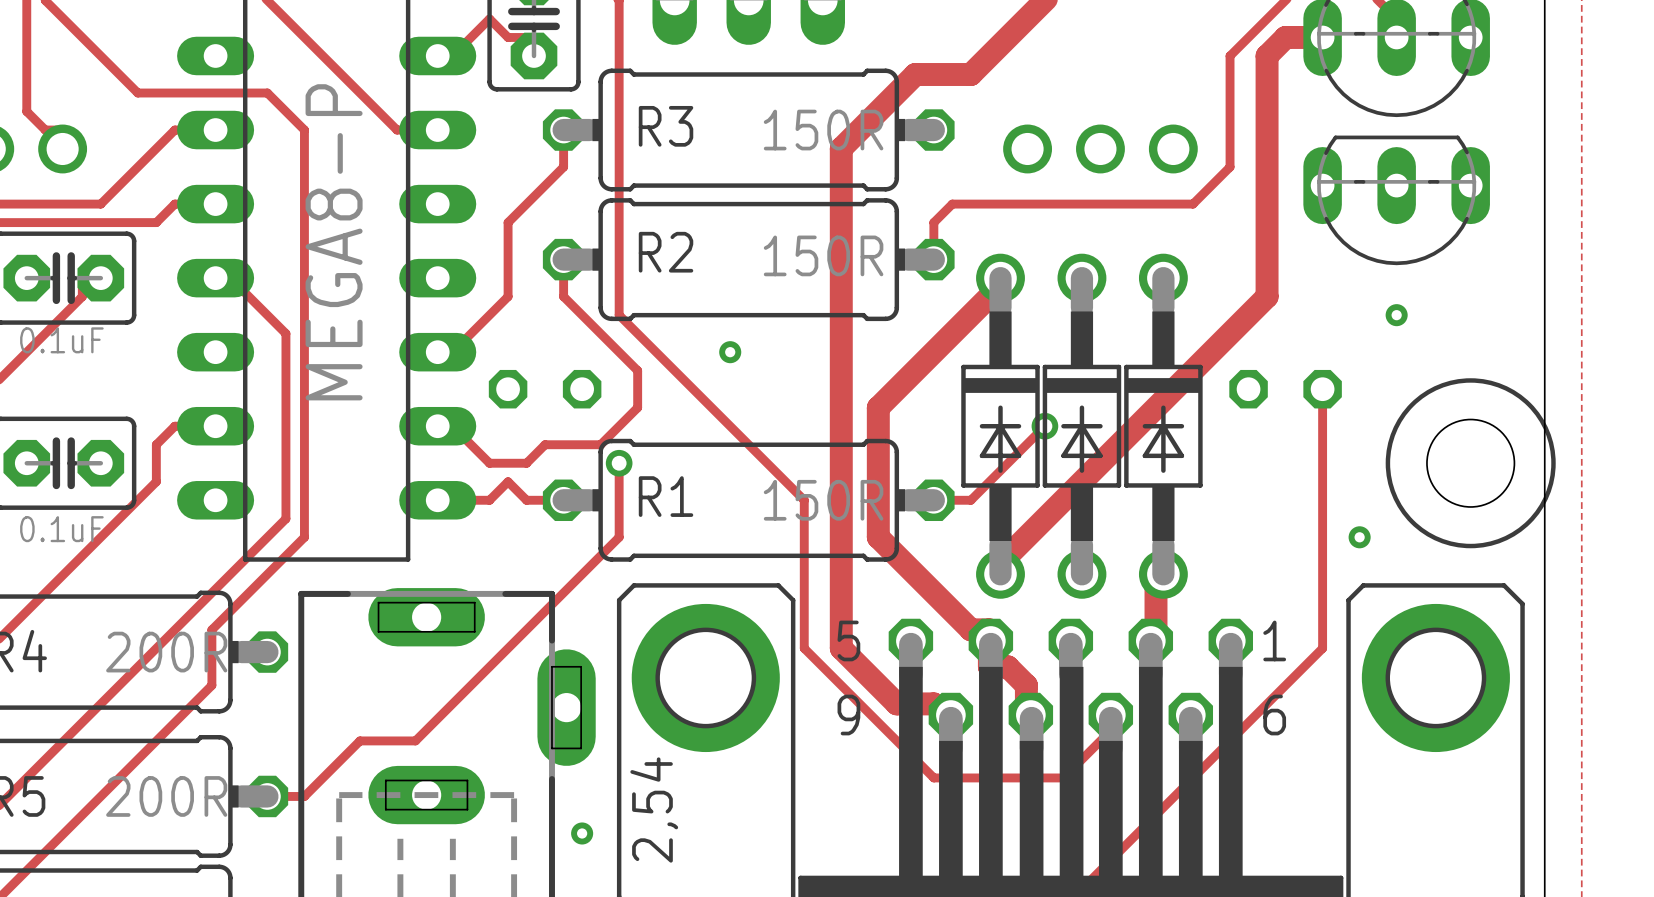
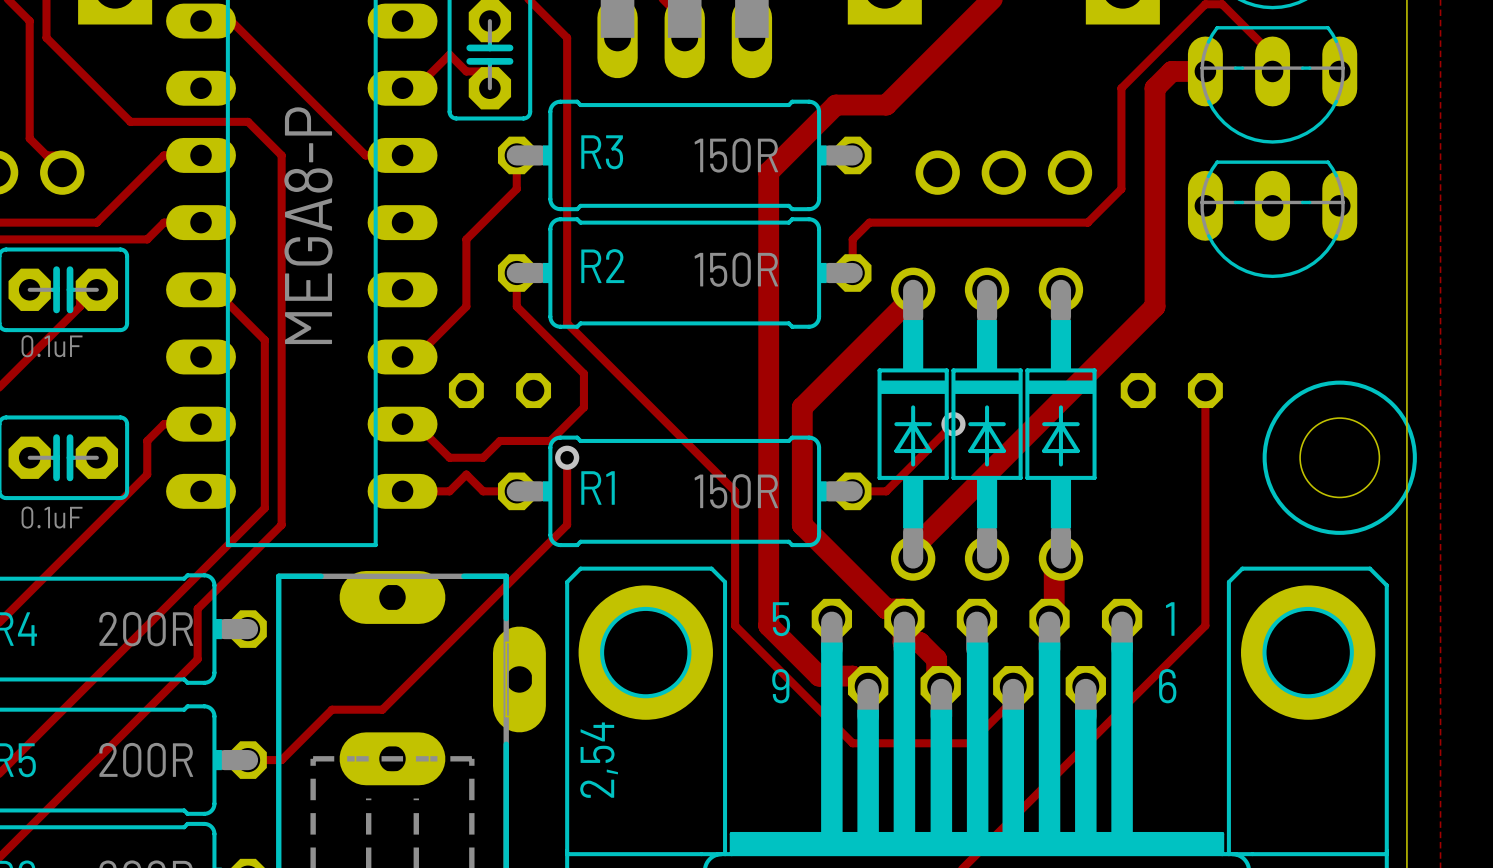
via: (1396, 315) -> none
via: (730, 352) -> none
via: (1359, 537) -> none
via: (582, 833) -> none

